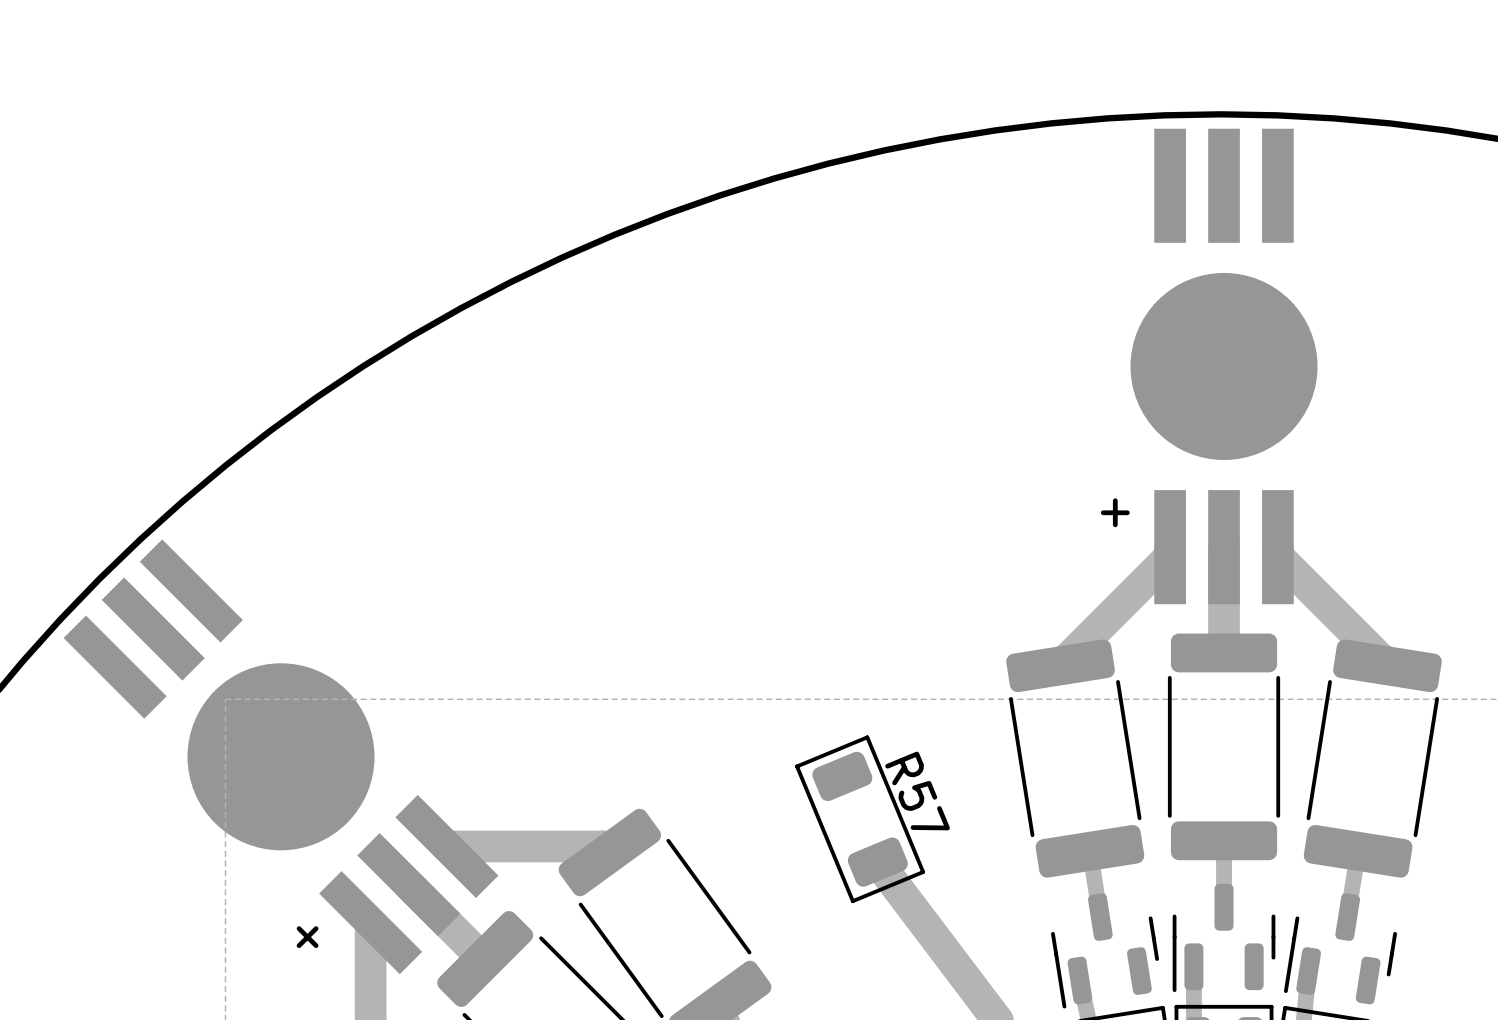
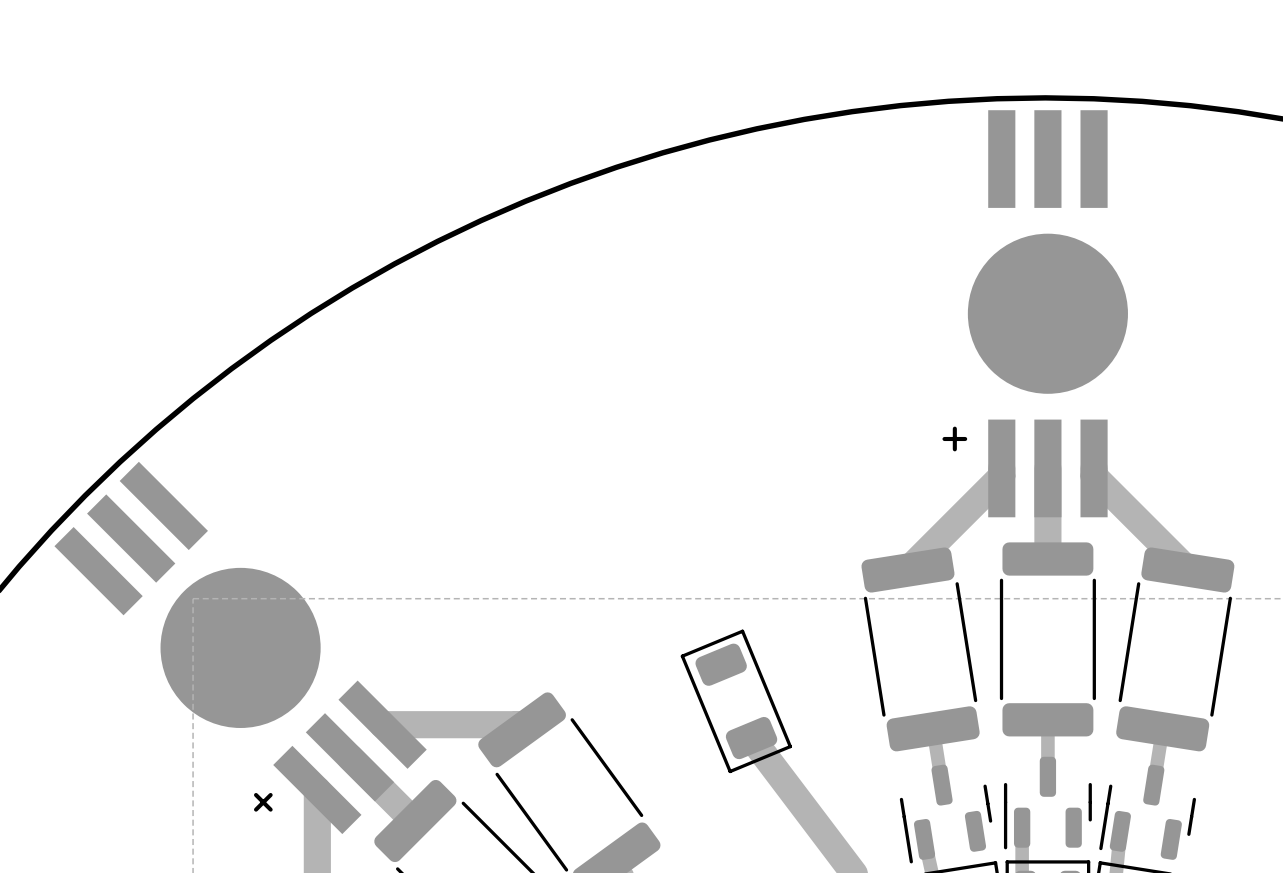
R57 name: R57 (917, 791) -> none

